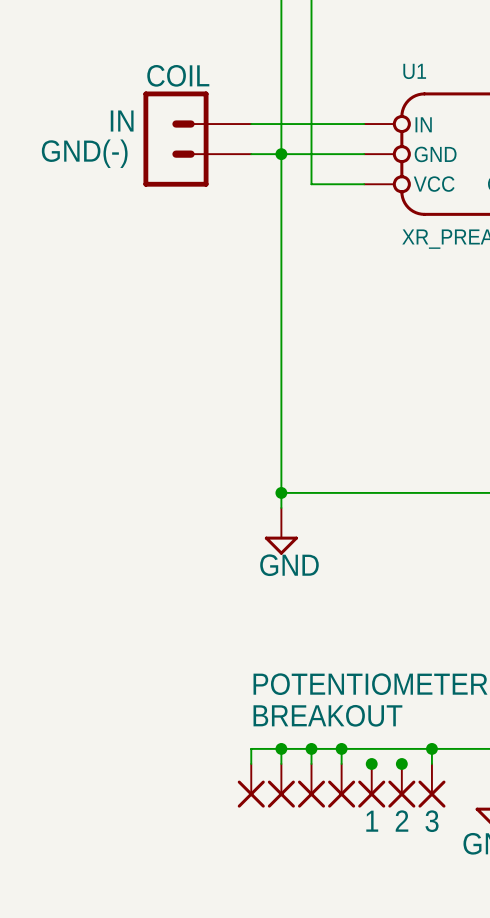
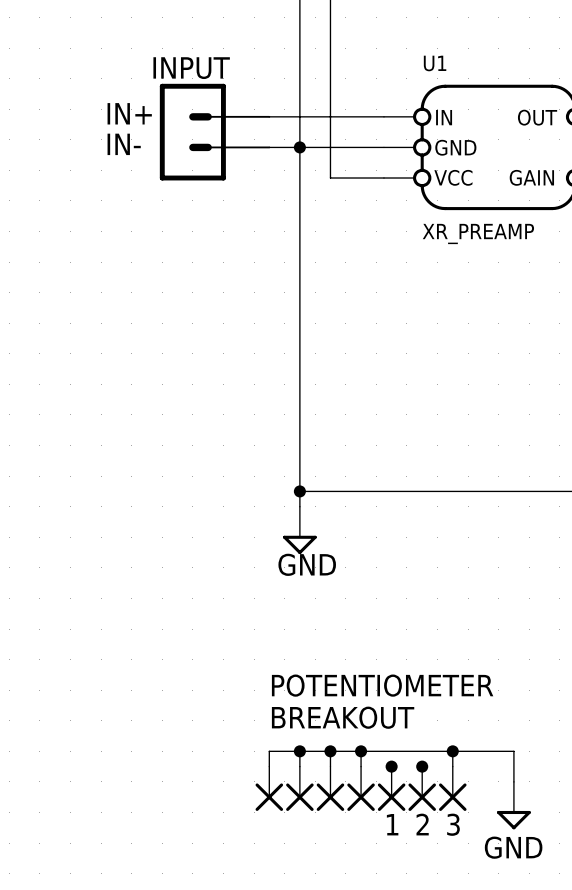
text: COIL (178, 75) -> INPUT (191, 68)
text: none -> IN+ (129, 113)
text: IN (122, 121) -> none
text: none -> IN- (124, 144)
text: GND(-) (84, 153) -> none

